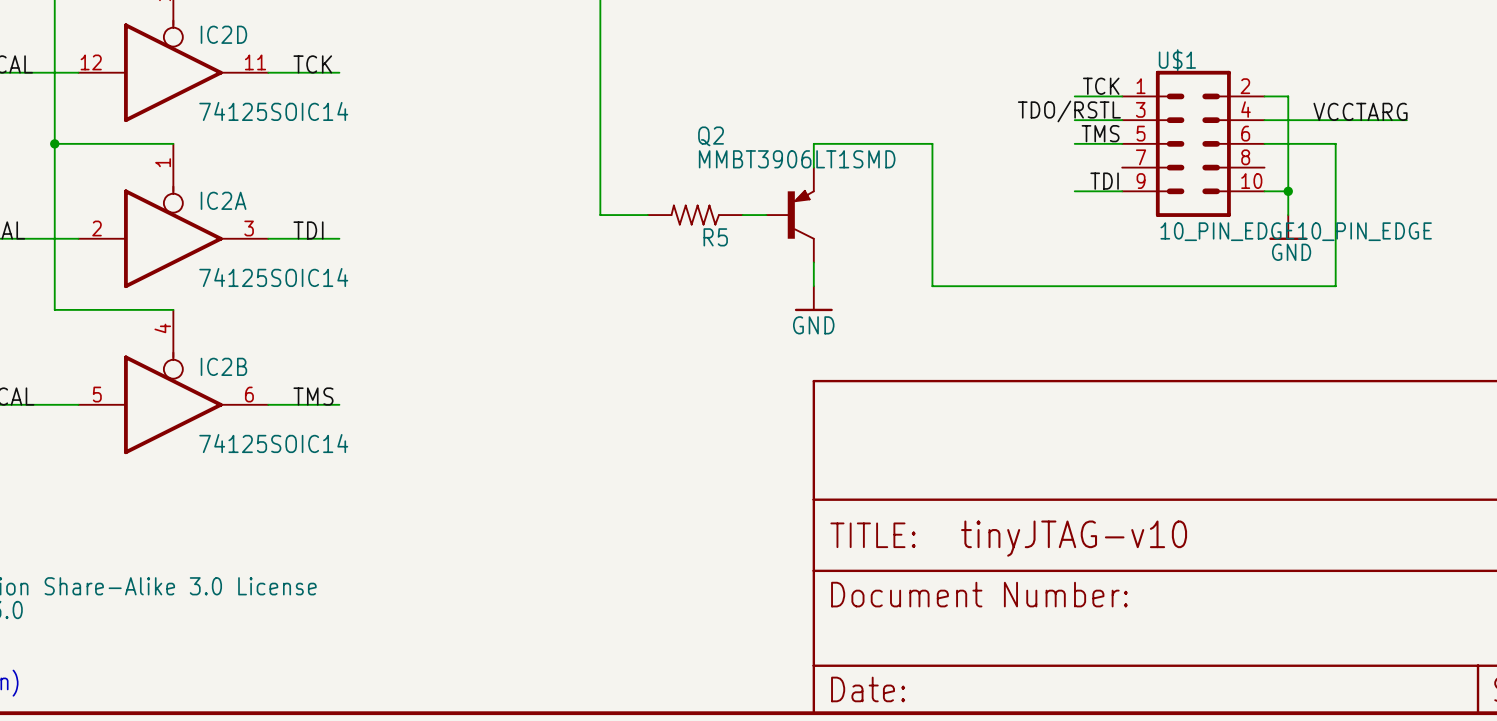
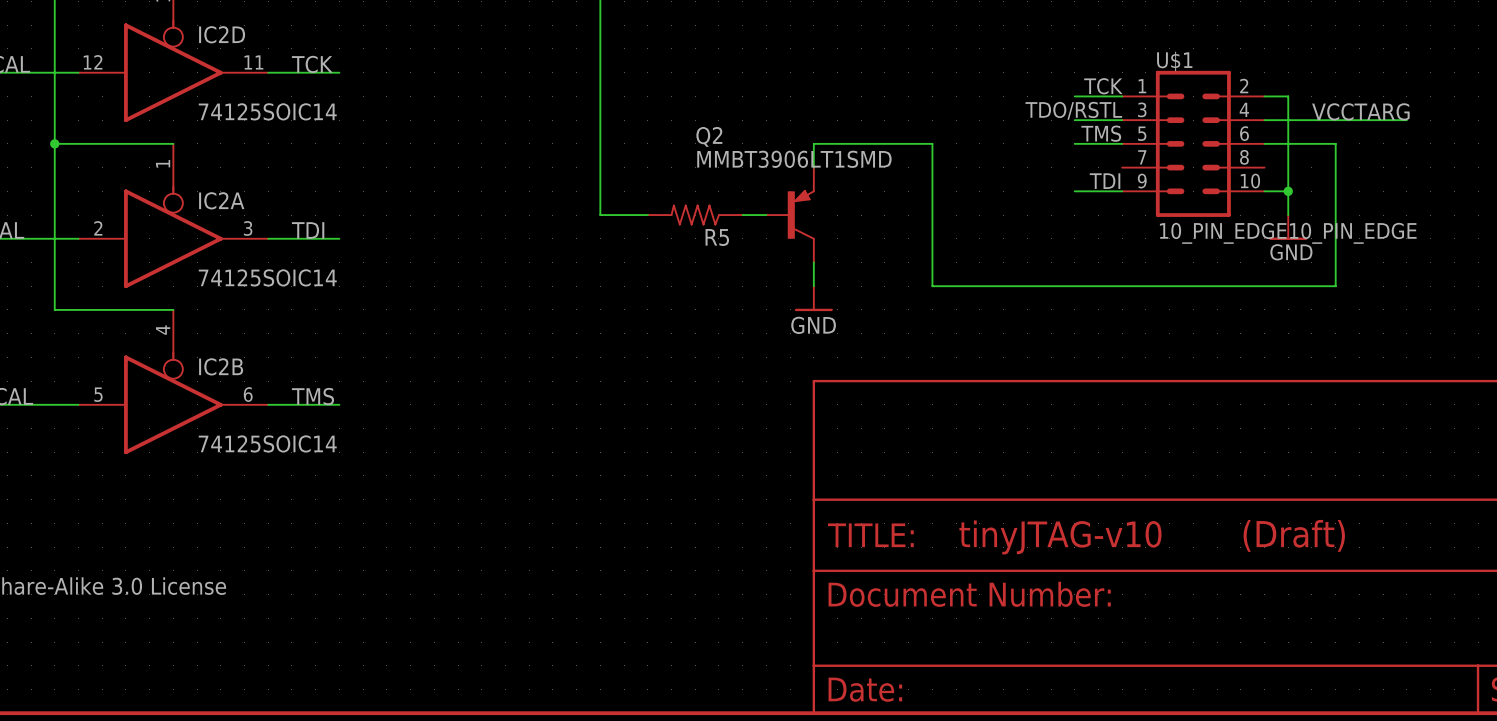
text: none -> (Draft) (1294, 535)

